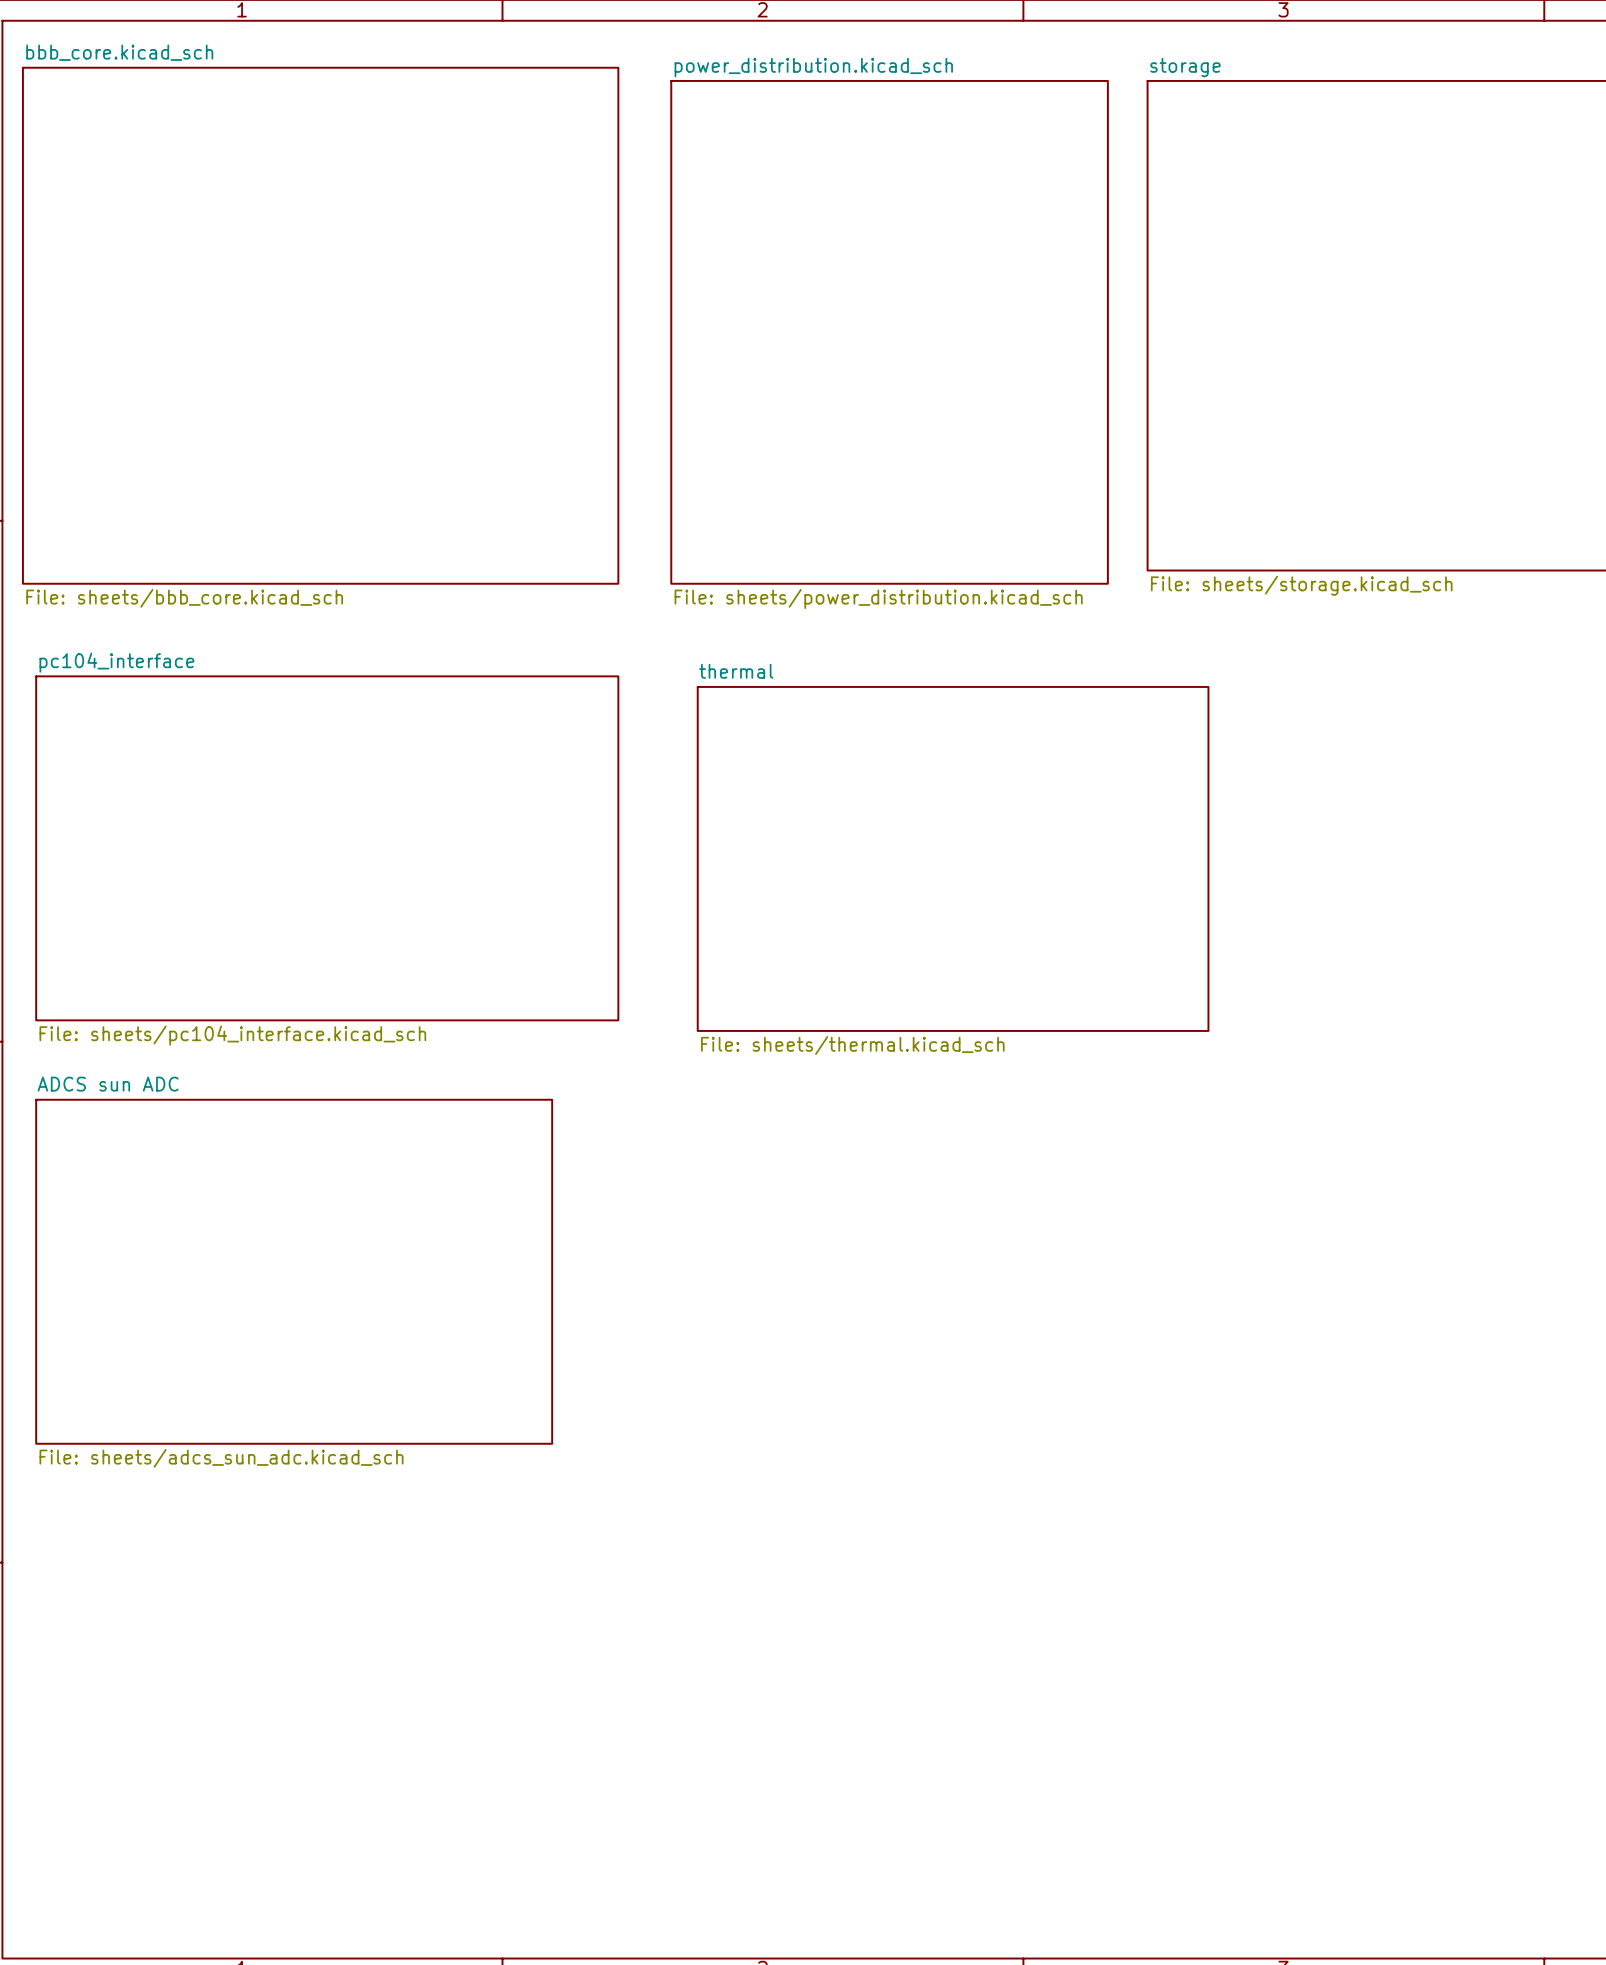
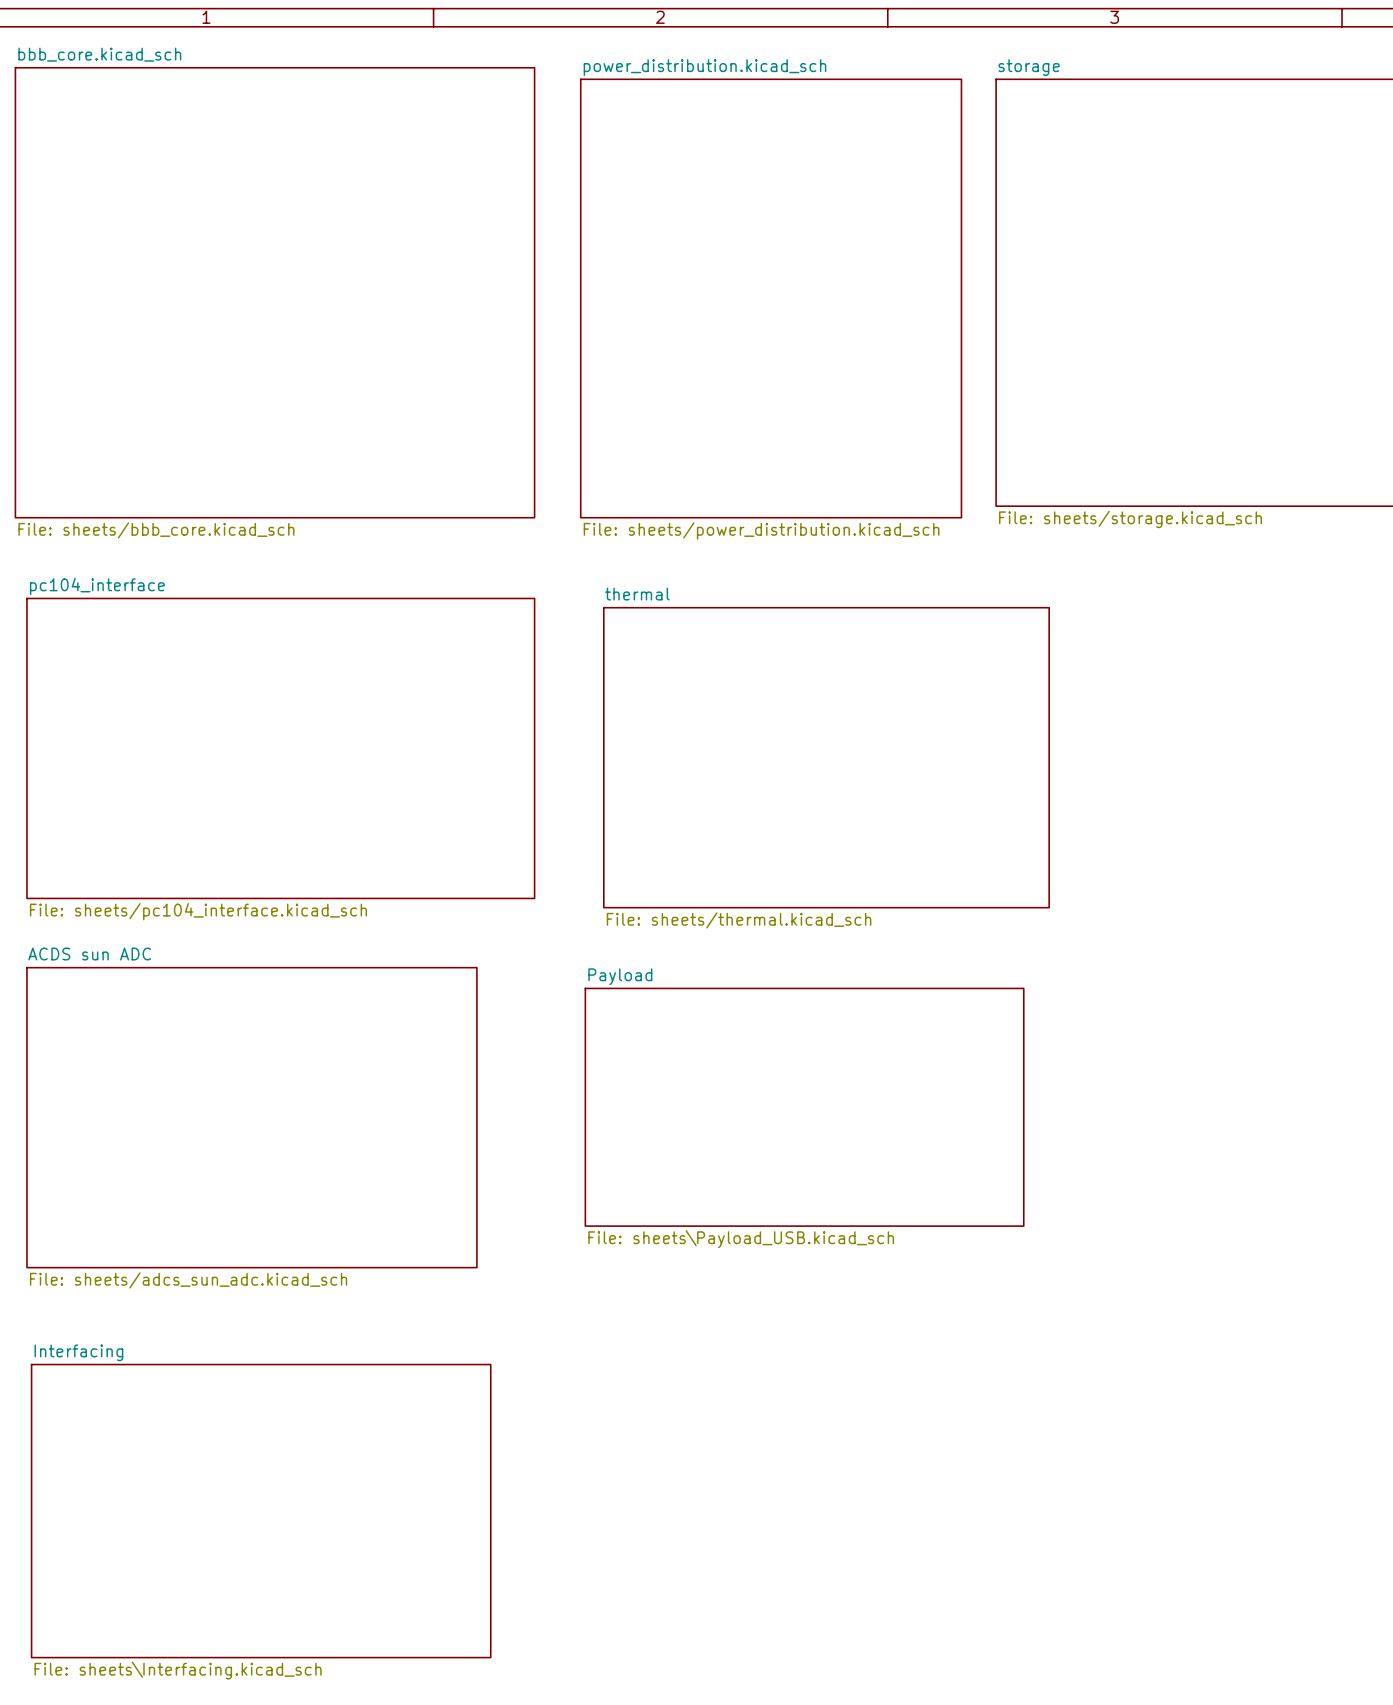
sheet ADCS sun ADC name: ADCS sun ADC (108, 1084) -> ACDS sun ADC (89, 954)
sheet Payload: none -> File: sheets\Payload_USB.kicad_sch (804, 1107)
sheet Interfacing: none -> File: sheets\Interfacing.kicad_sch (261, 1511)

